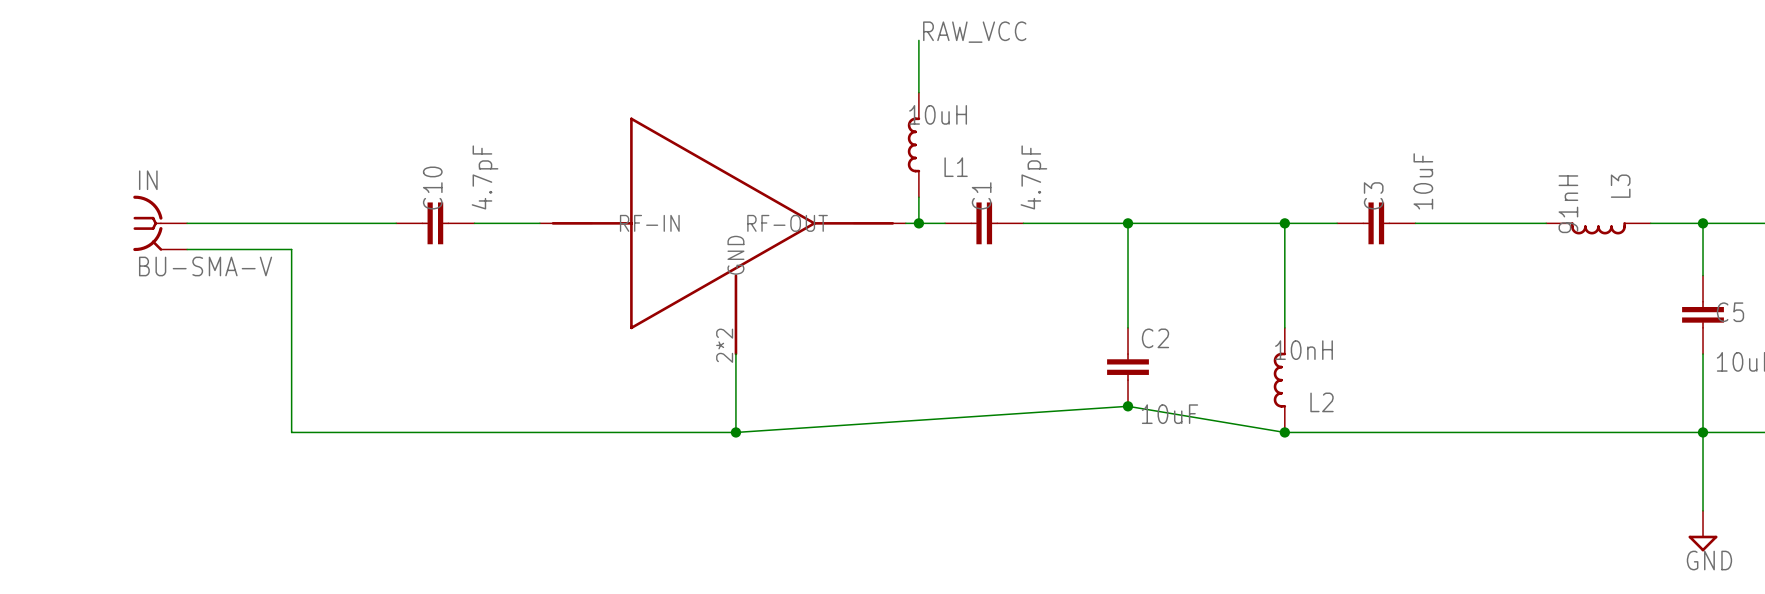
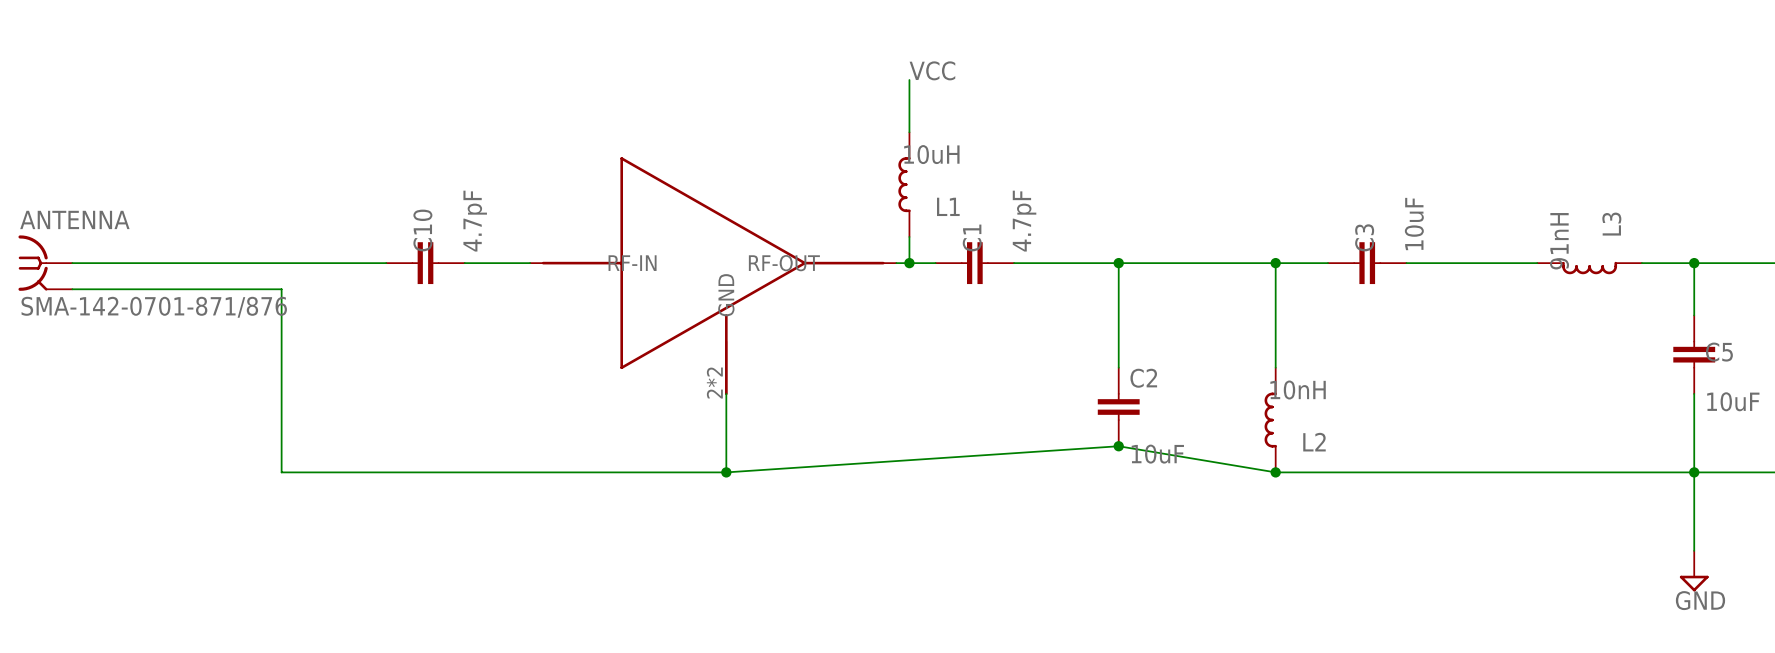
label: RAW_VCC (974, 32) -> VCC (932, 70)
ANTENNA: none -> SMA-142-0701-871/876 (45, 263)
wire: none -> (72, 263) (176, 263)
IN: BU-SMA-V (160, 223) -> none
wire: none -> (72, 289) (176, 289)

